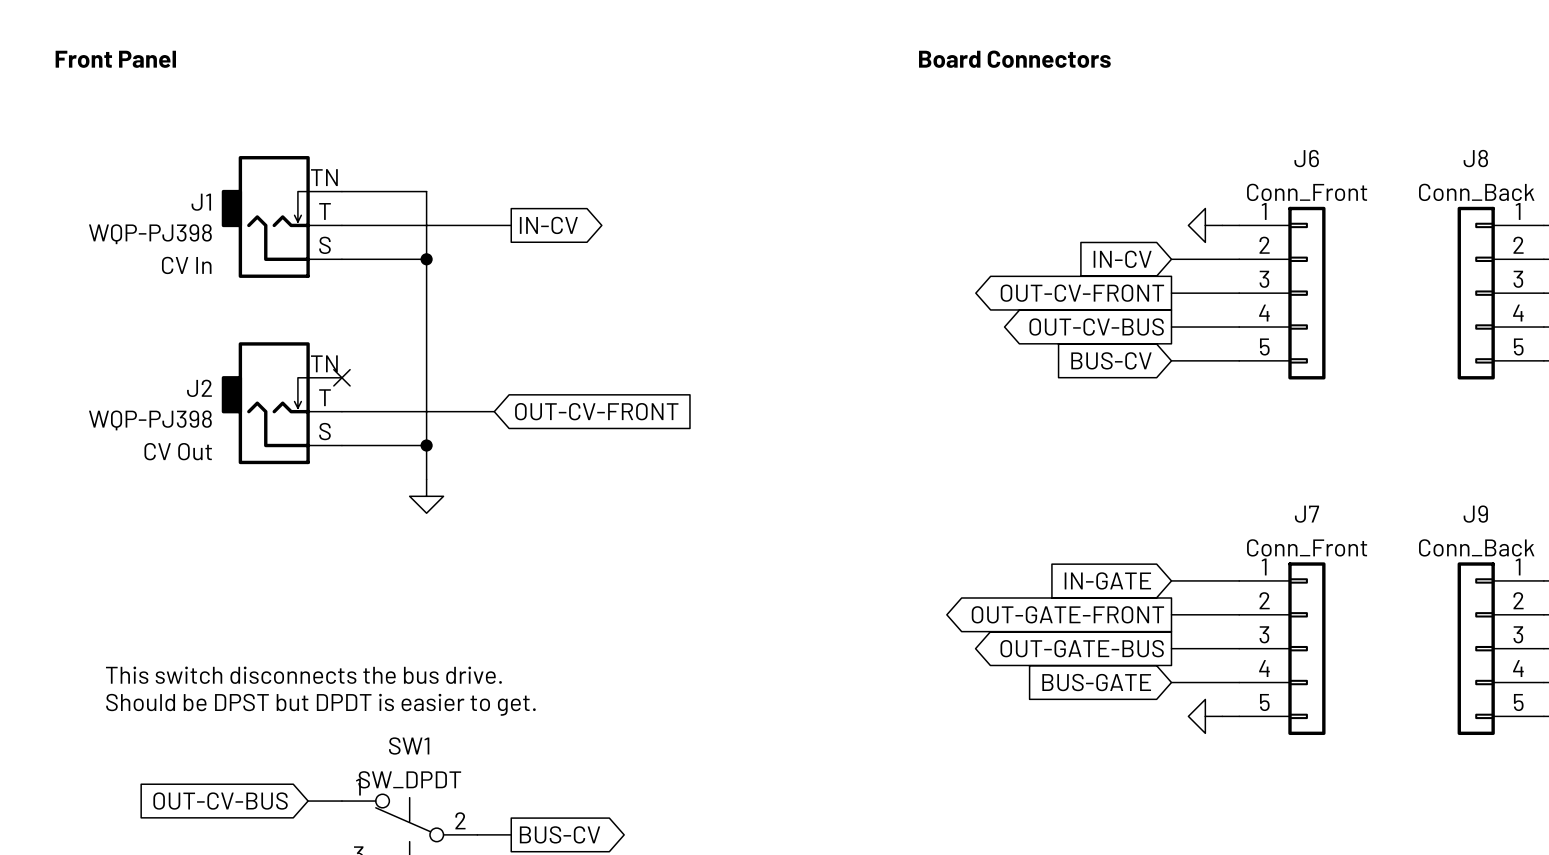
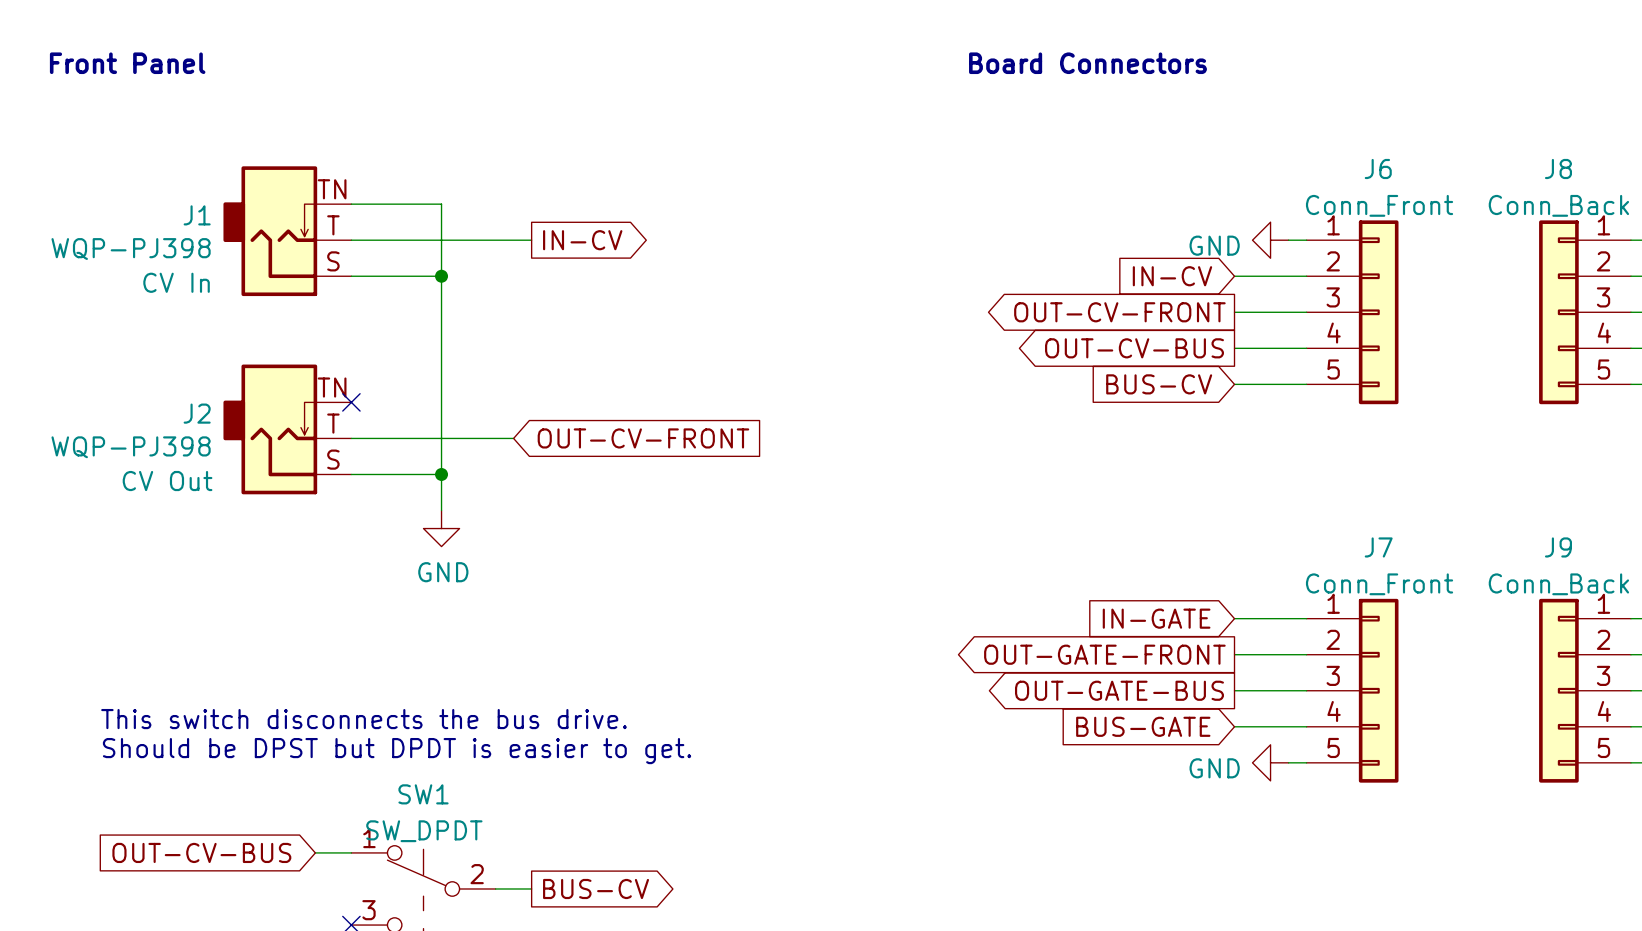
power symbol text: none -> GND (1214, 245)
power symbol text: none -> GND (443, 572)
power symbol text: none -> GND (1214, 768)

